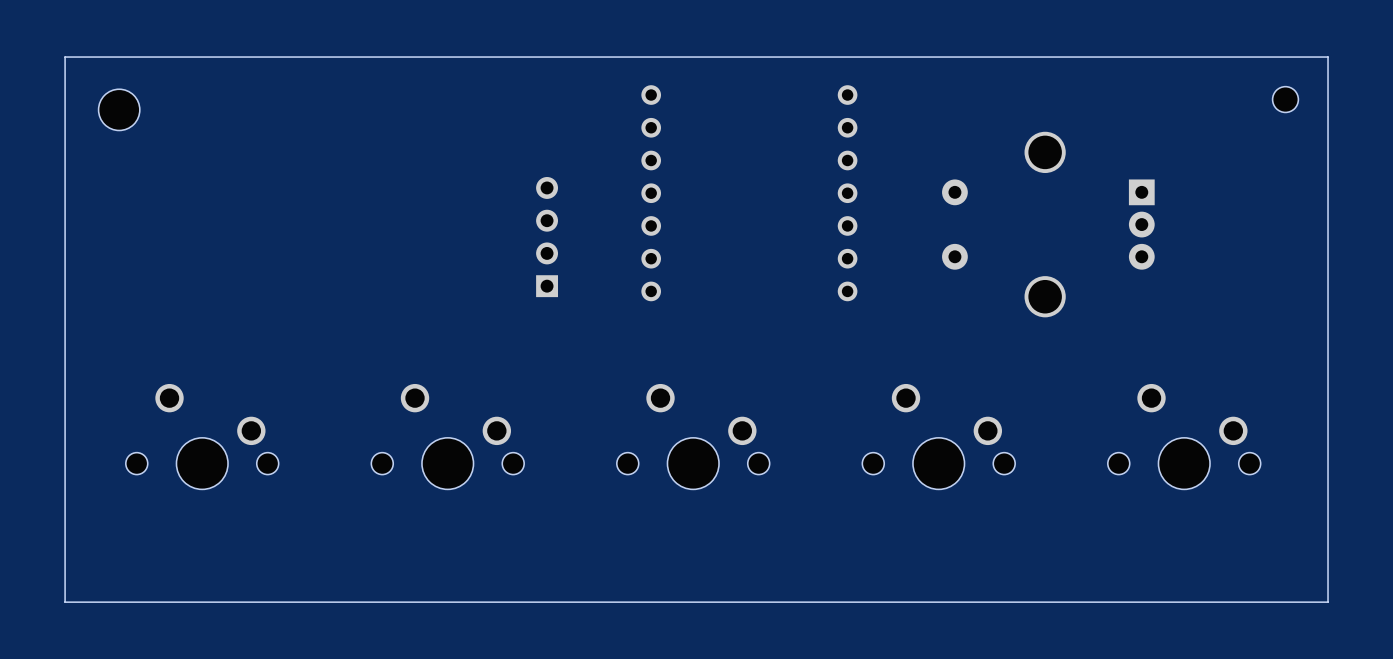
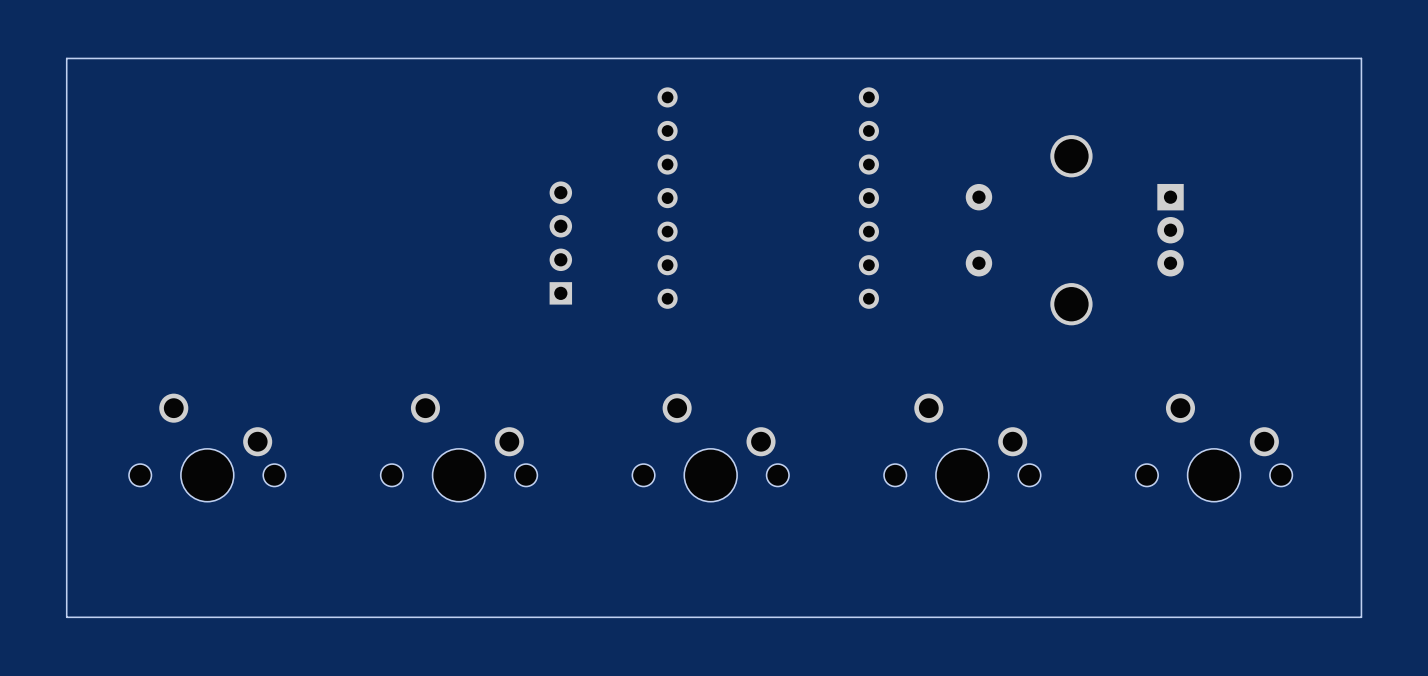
part: (1285, 99) -> none
part: (119, 109) -> none

